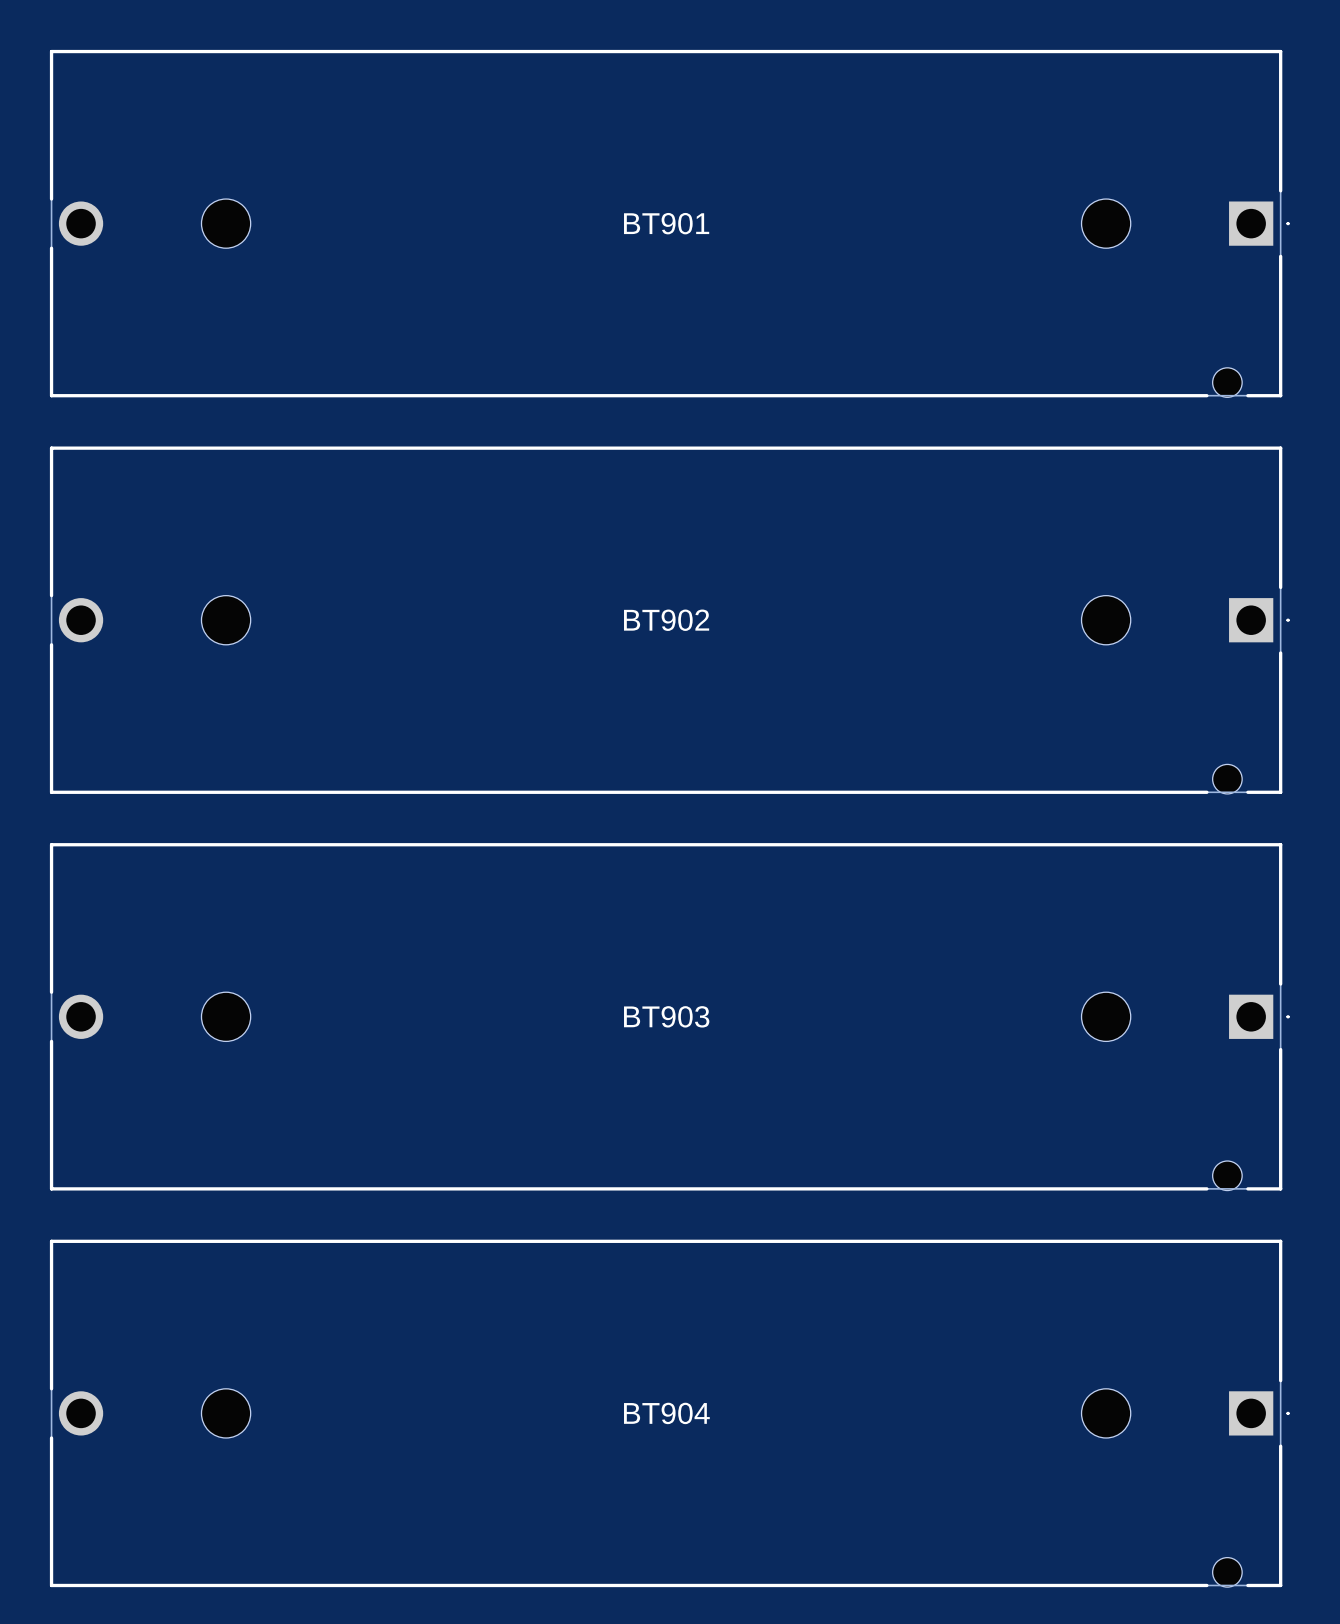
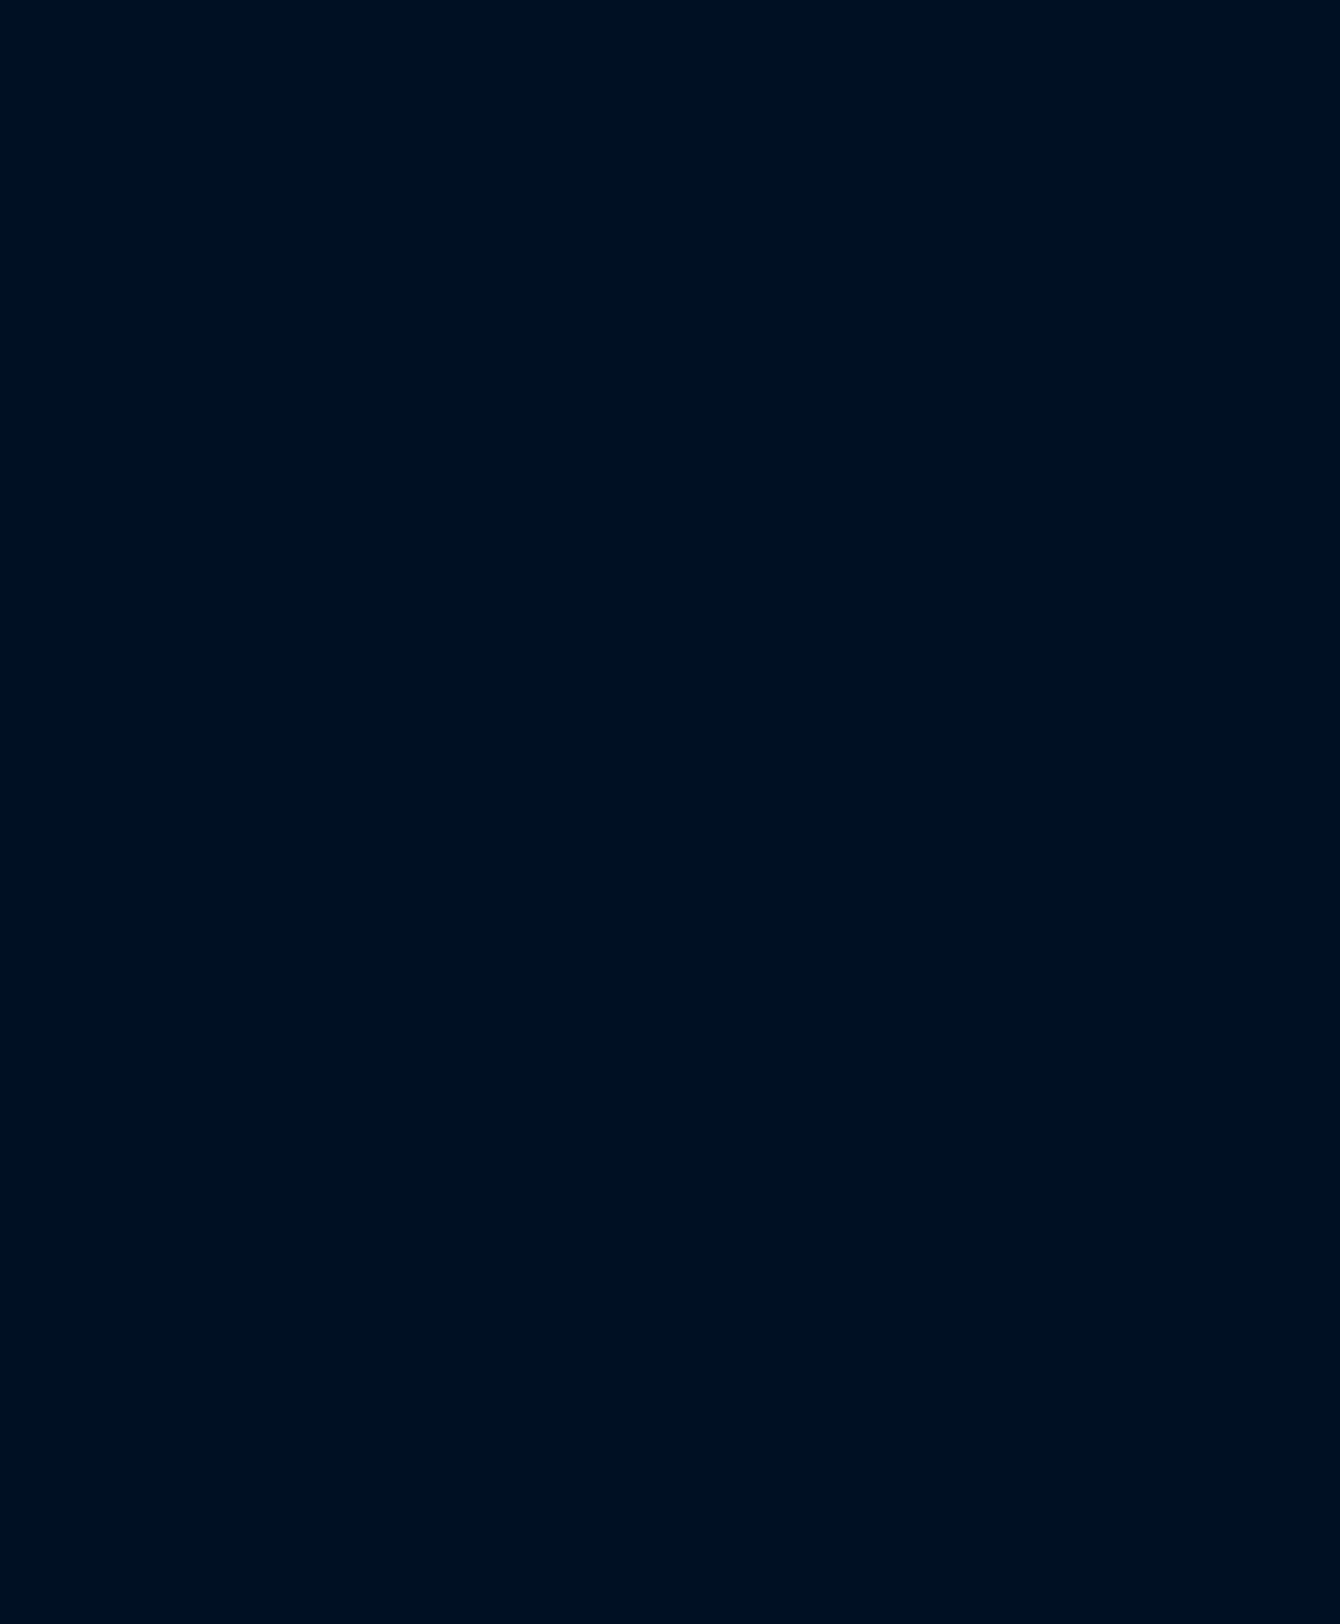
BT901: (669, 223) -> none
BT902: (669, 620) -> none
BT903: (669, 1016) -> none
BT904: (669, 1413) -> none

